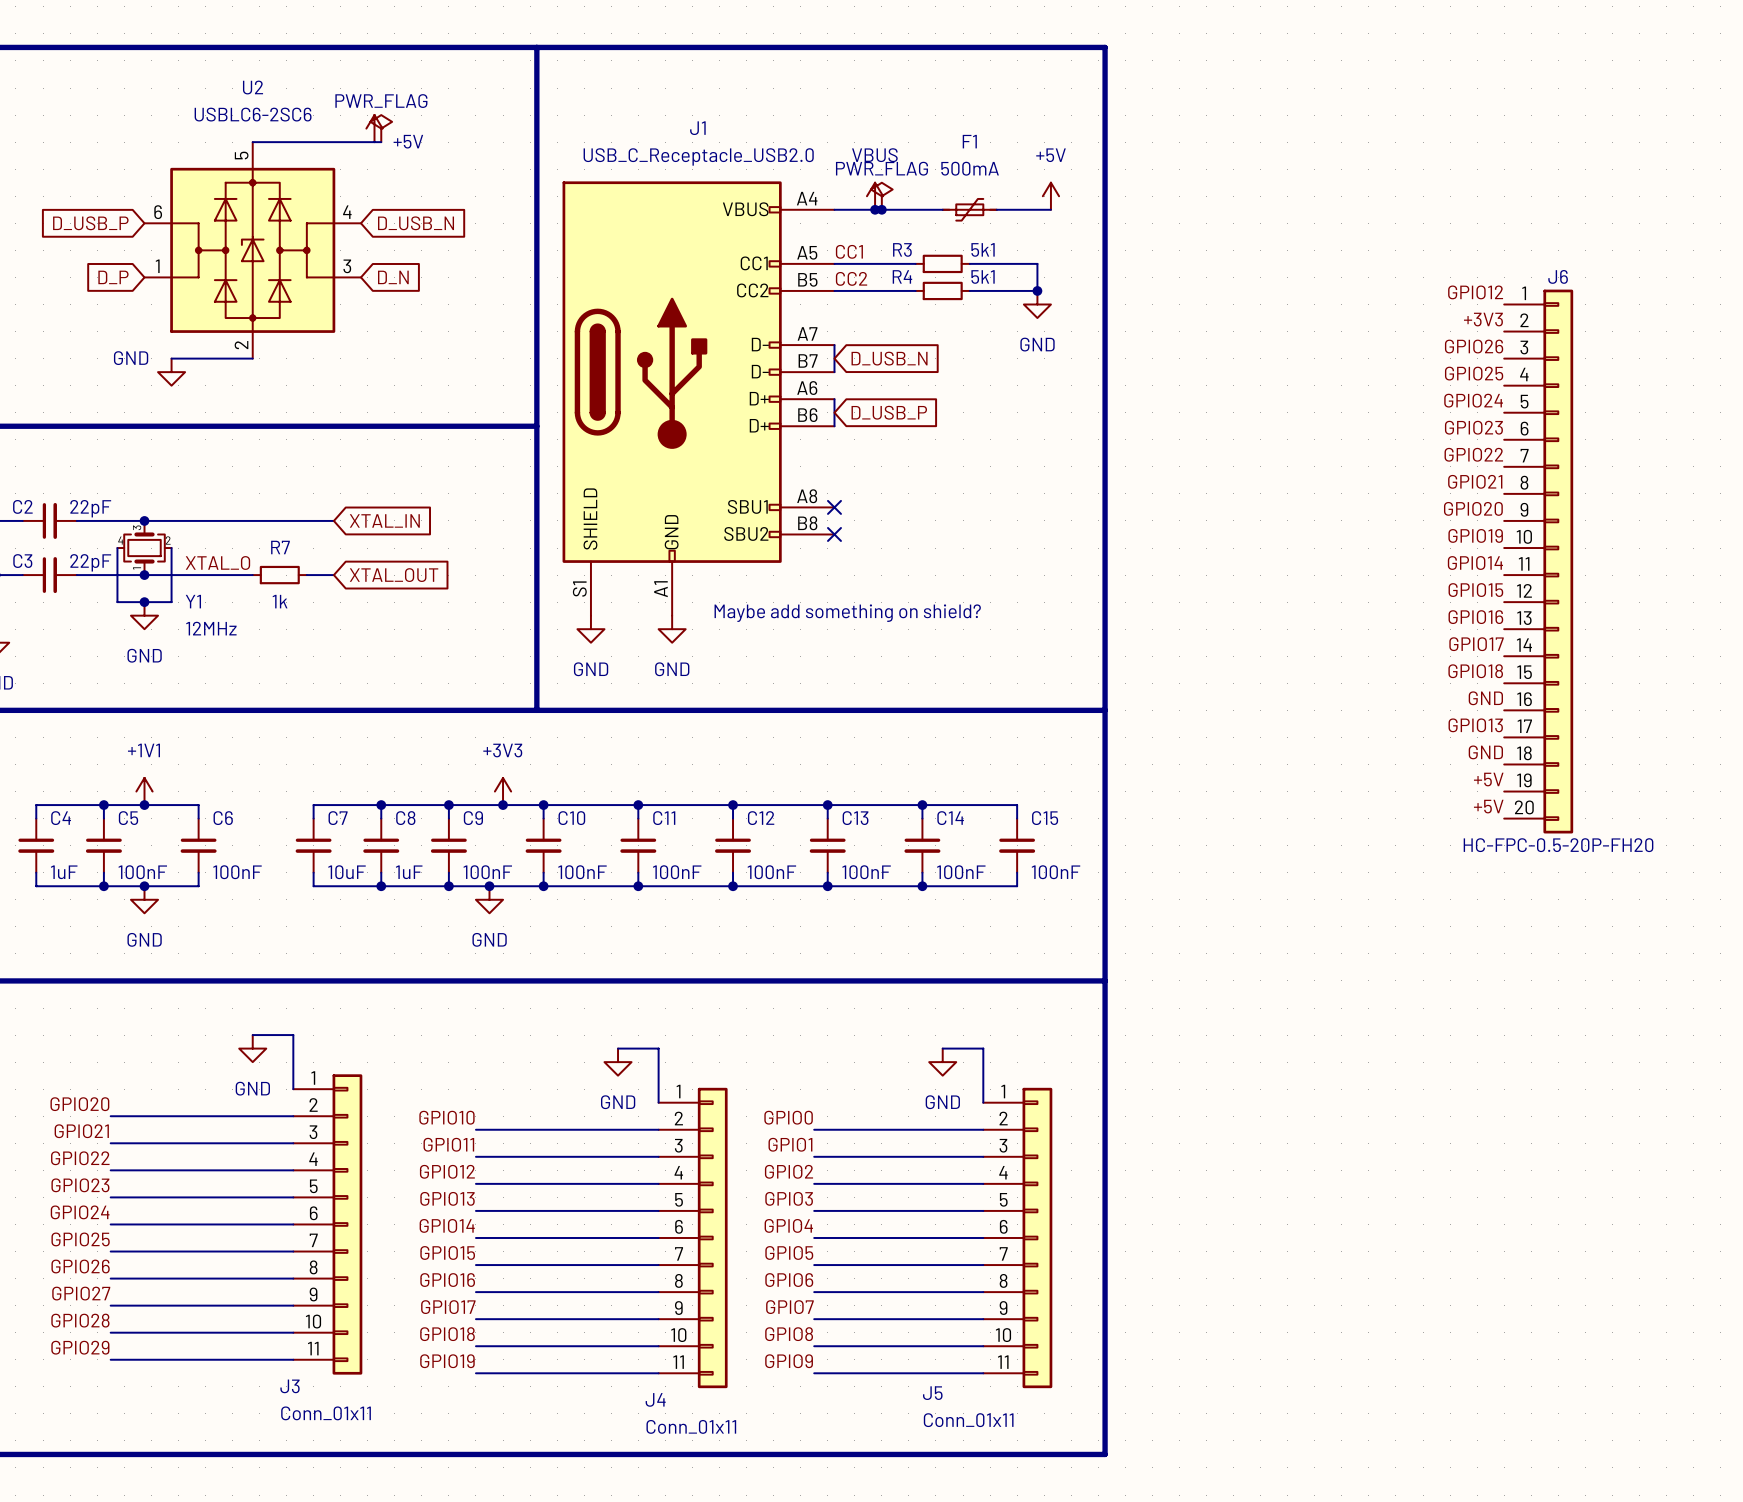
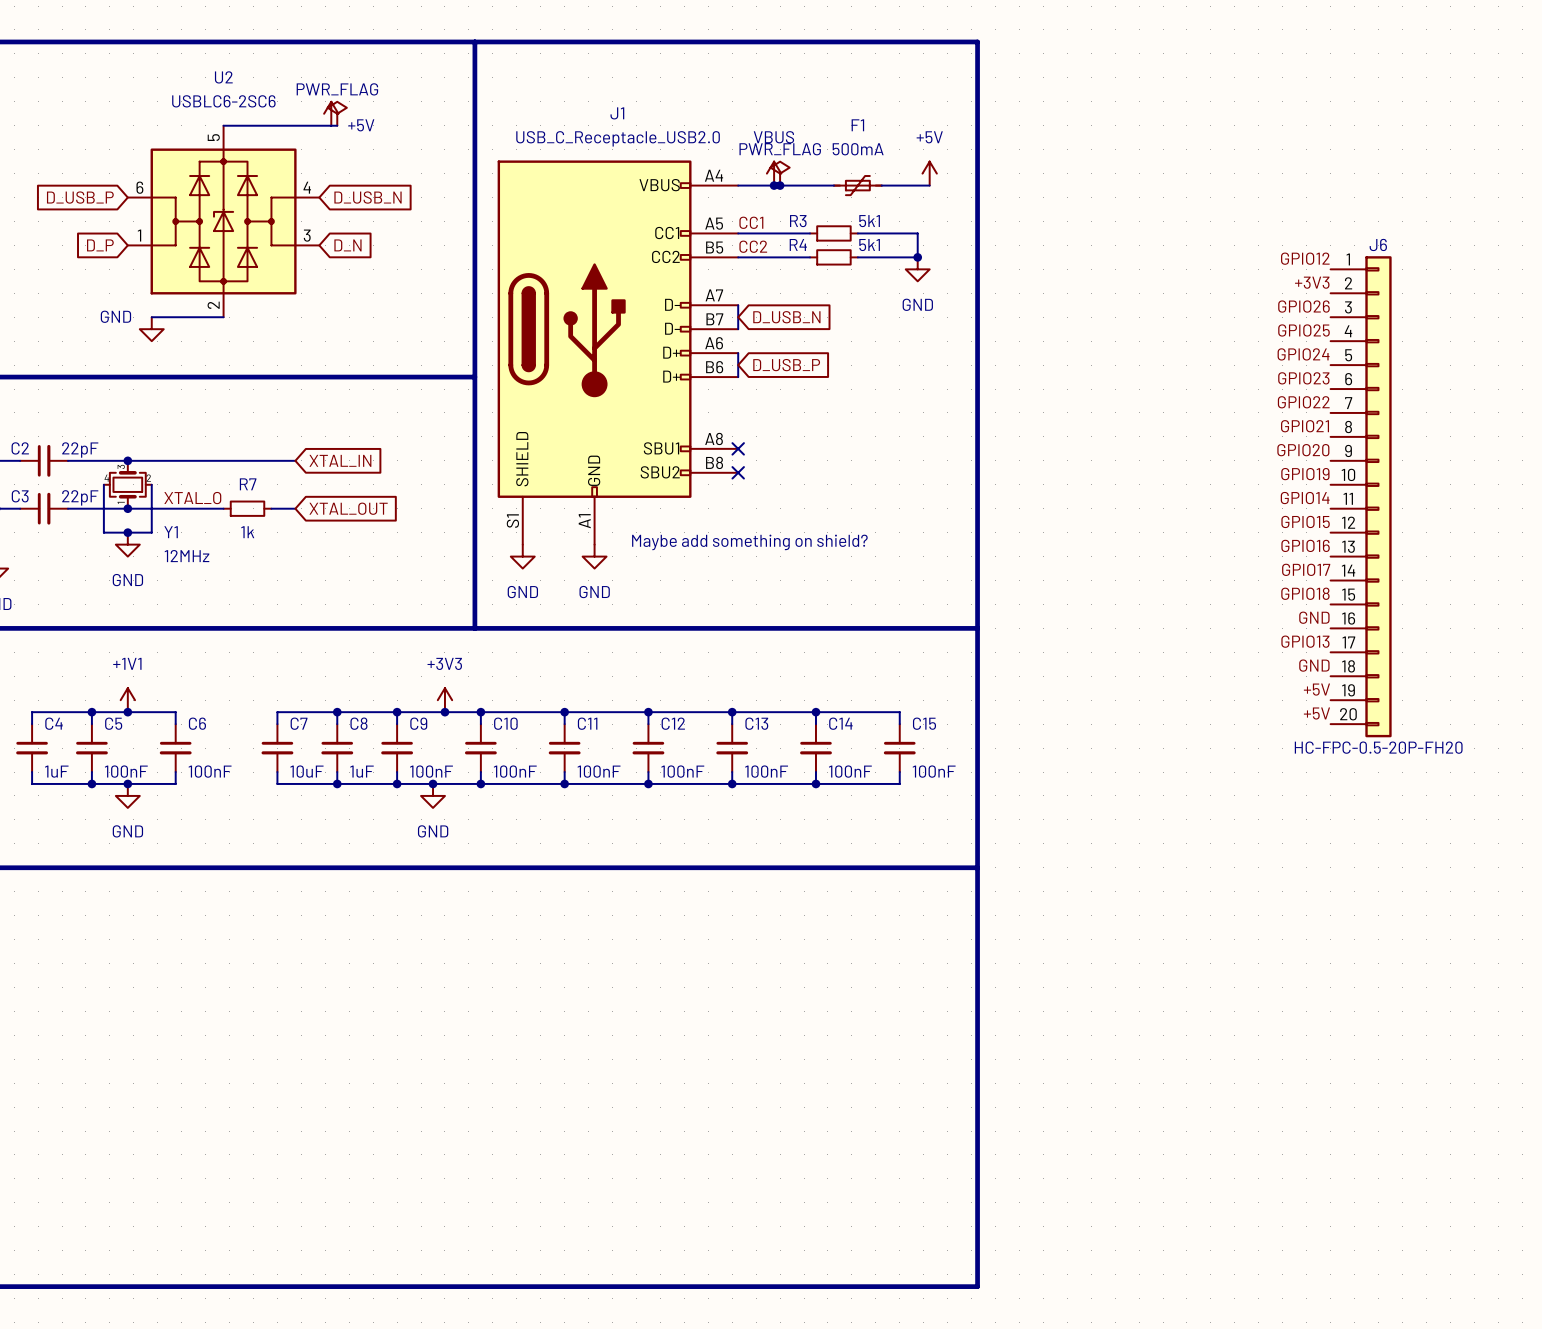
wire: (252, 1035) (293, 1035) (293, 1089) -> none
power symbol: GND (252, 1048) -> none
wire: (618, 1048) (658, 1048) (658, 1102) -> none
wire: (942, 1048) (983, 1048) (983, 1102) -> none
power symbol: GND (618, 1062) -> none
power symbol: GND (942, 1062) -> none
label: GPIO20 (79, 1104) -> none
wire: (110, 1116) (293, 1116) -> none
label: GPIO10 (446, 1117) -> none
label: GPIO0 (788, 1117) -> none
wire: (475, 1129) (658, 1129) -> none
wire: (814, 1129) (983, 1129) -> none
label: GPIO21 (81, 1131) -> none
wire: (110, 1143) (293, 1143) -> none
label: GPIO11 (448, 1144) -> none
label: GPIO1 (790, 1144) -> none
wire: (475, 1156) (658, 1156) -> none
wire: (814, 1156) (983, 1156) -> none
label: GPIO22 (80, 1158) -> none
wire: (110, 1170) (293, 1170) -> none
label: GPIO12 (447, 1171) -> none
label: GPIO2 (788, 1171) -> none
wire: (475, 1183) (658, 1183) -> none
wire: (814, 1183) (983, 1183) -> none
label: GPIO23 (80, 1185) -> none
wire: (110, 1197) (293, 1197) -> none
label: GPIO13 (447, 1198) -> none
label: GPIO3 (789, 1198) -> none
wire: (475, 1210) (658, 1210) -> none
wire: (814, 1210) (983, 1210) -> none
label: GPIO24 (80, 1212) -> none
wire: (110, 1224) (293, 1224) -> none
J3: Conn_01x11 (327, 1224) -> none
label: GPIO14 (447, 1225) -> none
label: GPIO4 (788, 1225) -> none
wire: (475, 1237) (658, 1237) -> none
J4: Conn_01x11 (693, 1237) -> none
wire: (814, 1237) (983, 1237) -> none
J5: Conn_01x11 (1017, 1237) -> none
label: GPIO25 (80, 1239) -> none
wire: (110, 1251) (293, 1251) -> none
label: GPIO15 (447, 1252) -> none
label: GPIO5 (789, 1252) -> none
wire: (475, 1265) (658, 1265) -> none
wire: (814, 1265) (983, 1265) -> none
label: GPIO26 (80, 1266) -> none
wire: (110, 1278) (293, 1278) -> none
label: GPIO16 (447, 1280) -> none
label: GPIO6 (789, 1280) -> none
wire: (475, 1292) (658, 1292) -> none
wire: (814, 1292) (983, 1292) -> none
label: GPIO27 (81, 1293) -> none
wire: (110, 1305) (293, 1305) -> none
label: GPIO17 (448, 1307) -> none
label: GPIO7 (789, 1307) -> none
wire: (475, 1319) (658, 1319) -> none
wire: (814, 1319) (983, 1319) -> none
label: GPIO28 (80, 1320) -> none
wire: (110, 1332) (293, 1332) -> none
label: GPIO18 (447, 1334) -> none
label: GPIO8 (789, 1334) -> none
wire: (475, 1346) (658, 1346) -> none
wire: (814, 1346) (983, 1346) -> none
label: GPIO29 (80, 1347) -> none
wire: (110, 1359) (293, 1359) -> none
label: GPIO19 (447, 1361) -> none
label: GPIO9 (789, 1361) -> none
wire: (475, 1373) (658, 1373) -> none
wire: (814, 1373) (983, 1373) -> none

